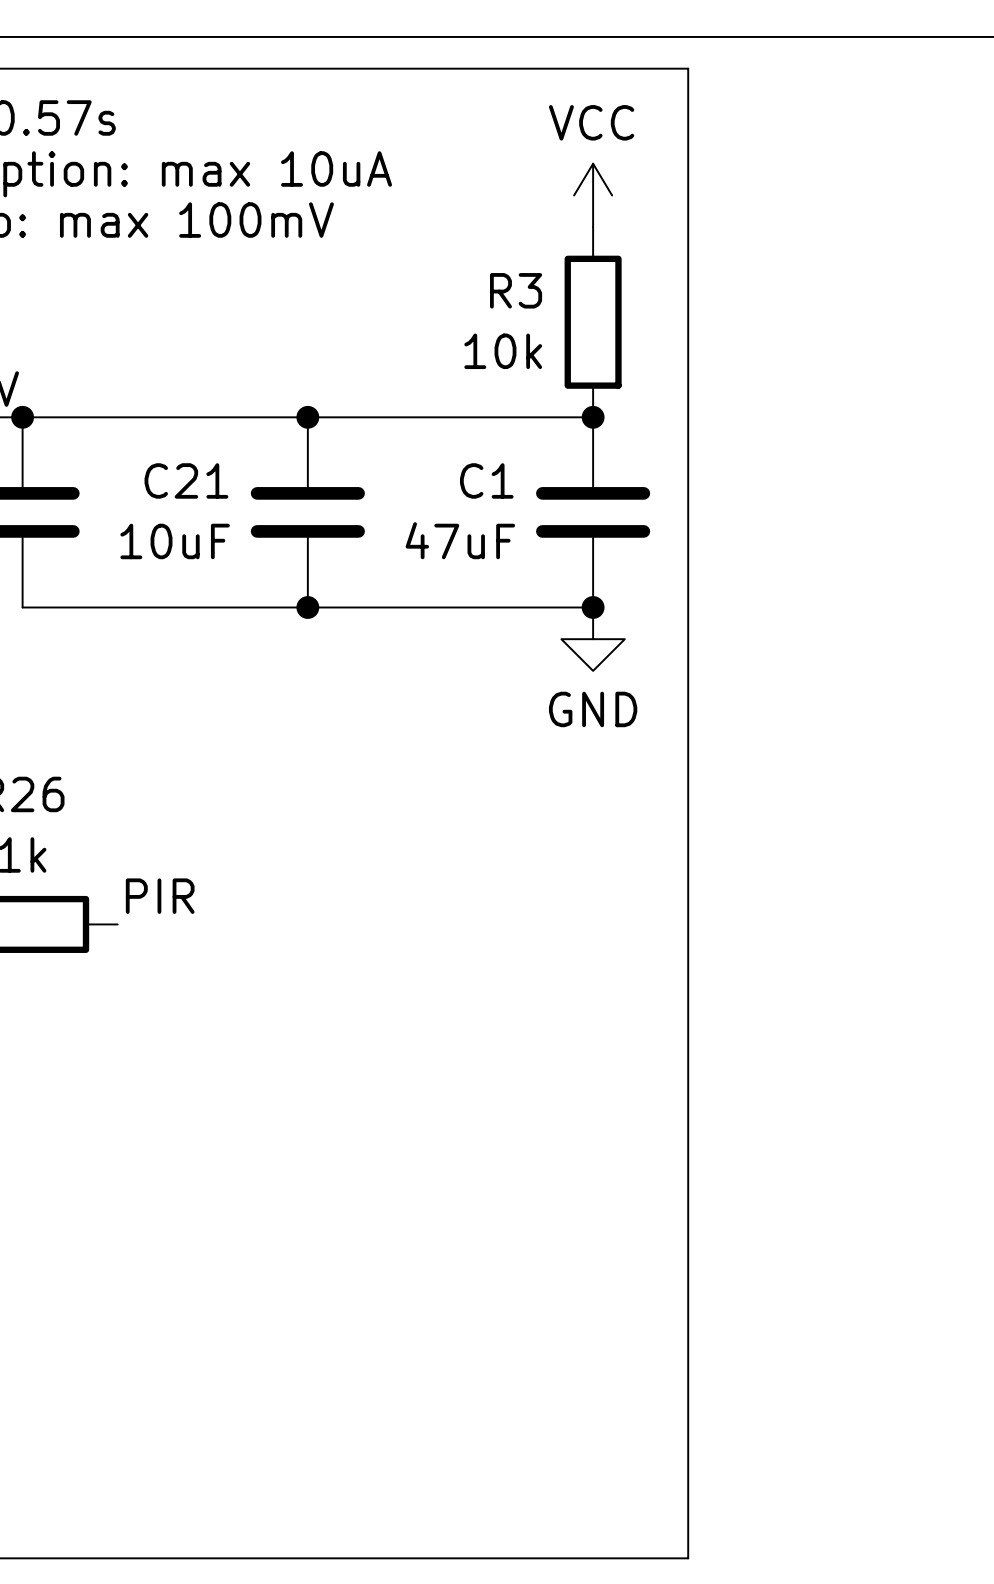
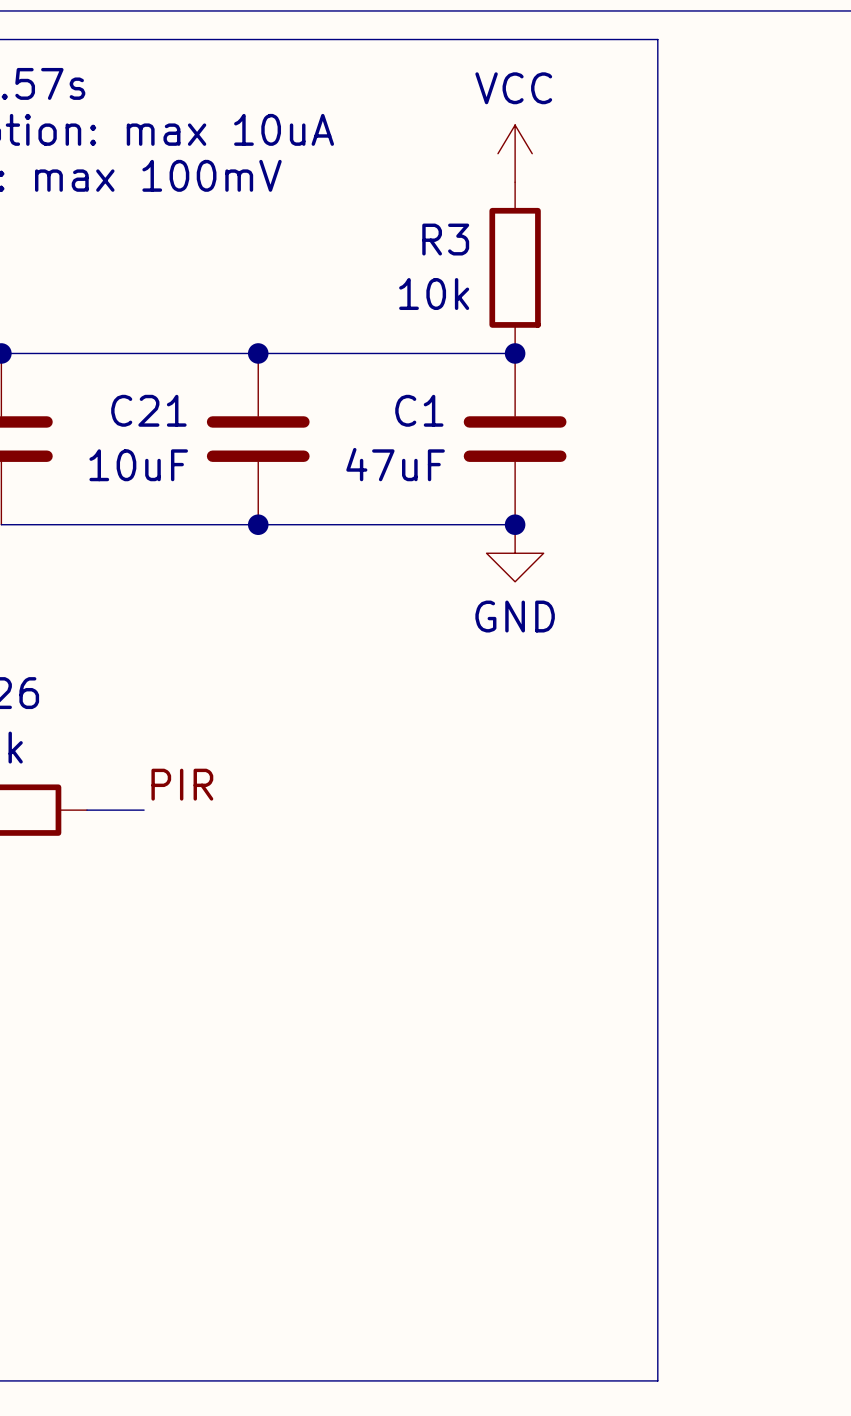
line: (688, 68) (688, 1558) -> (600, 39) (657, 39) (657, 1380) (600, 1380)
label position: PIR (160, 896) -> PIR (182, 784)
wire: none -> (86, 810) (144, 810)

